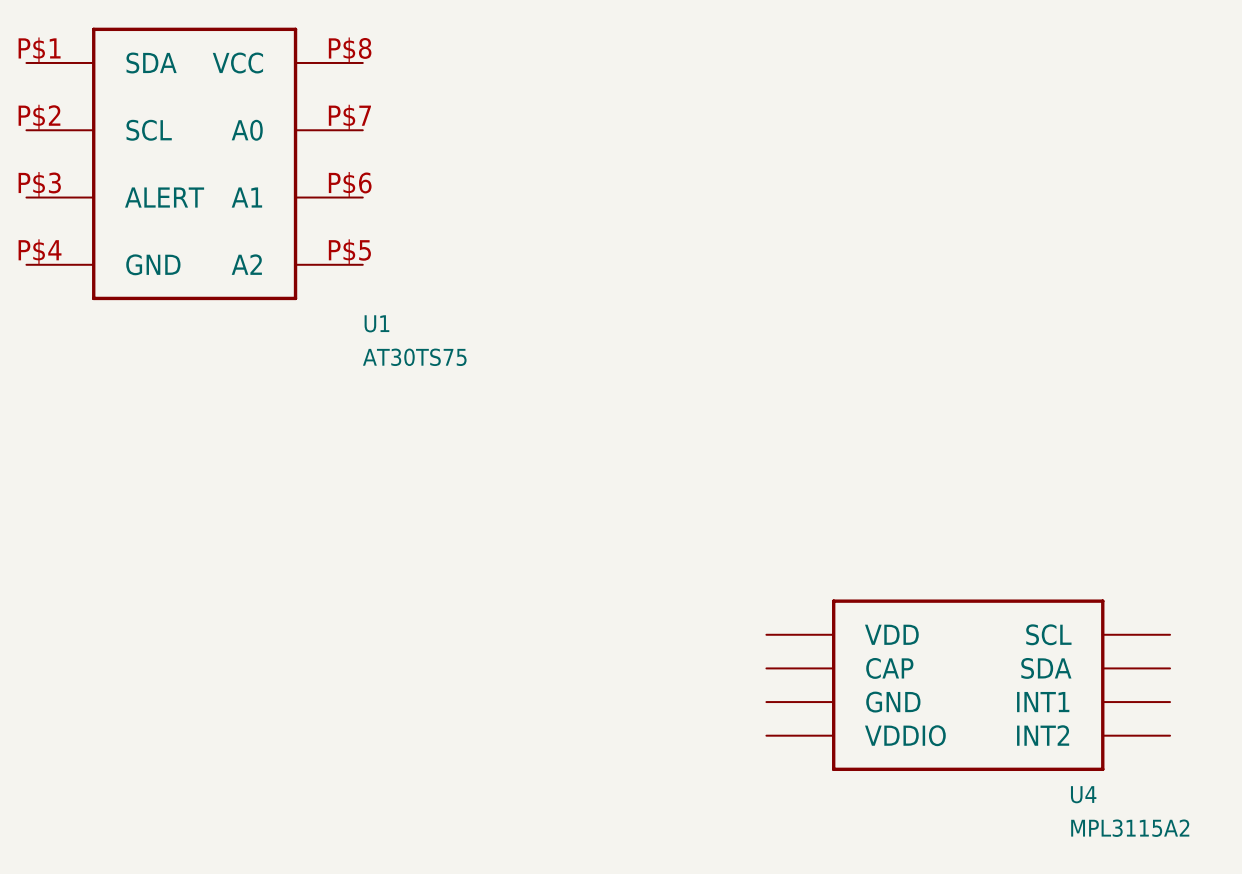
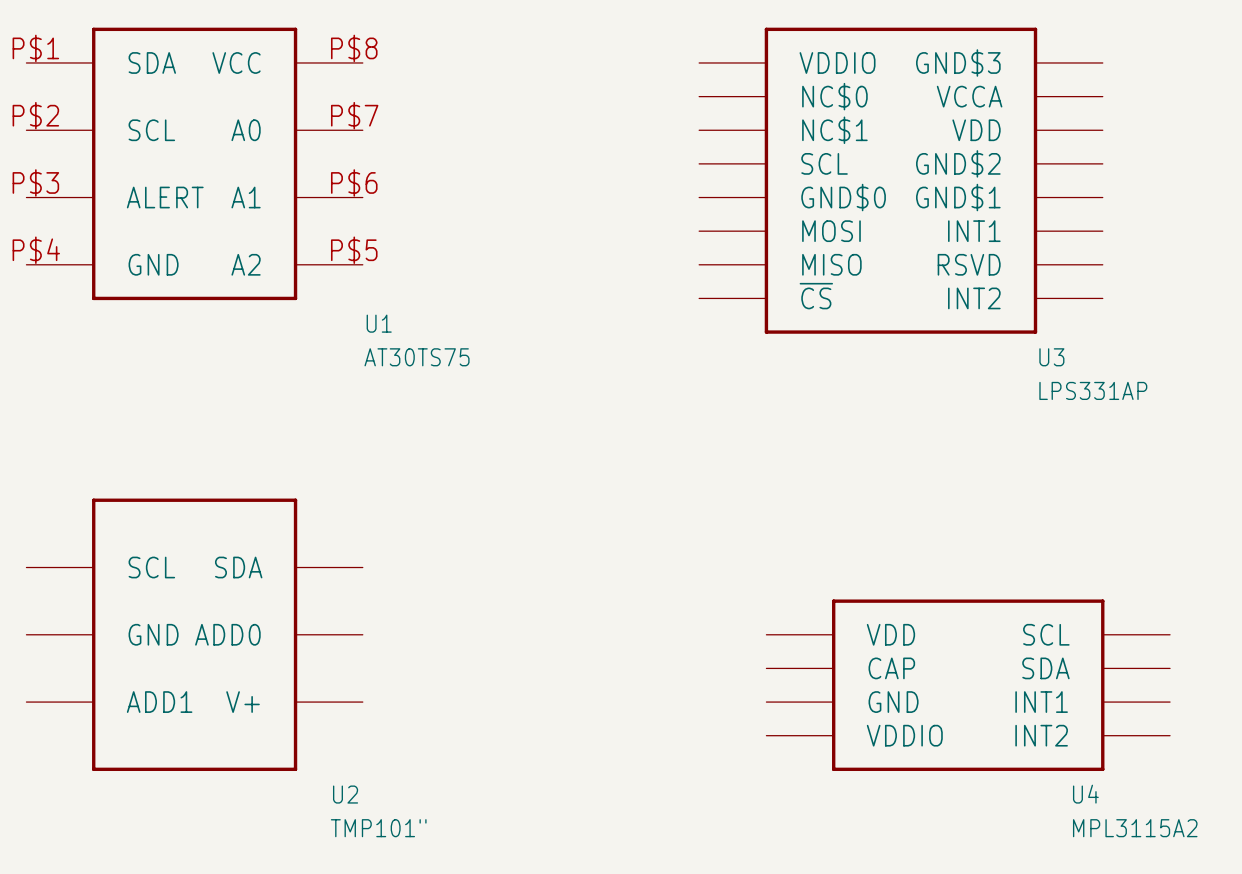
U3: none -> LPS331AP (900, 180)
U2: none -> TMP101" (194, 634)

